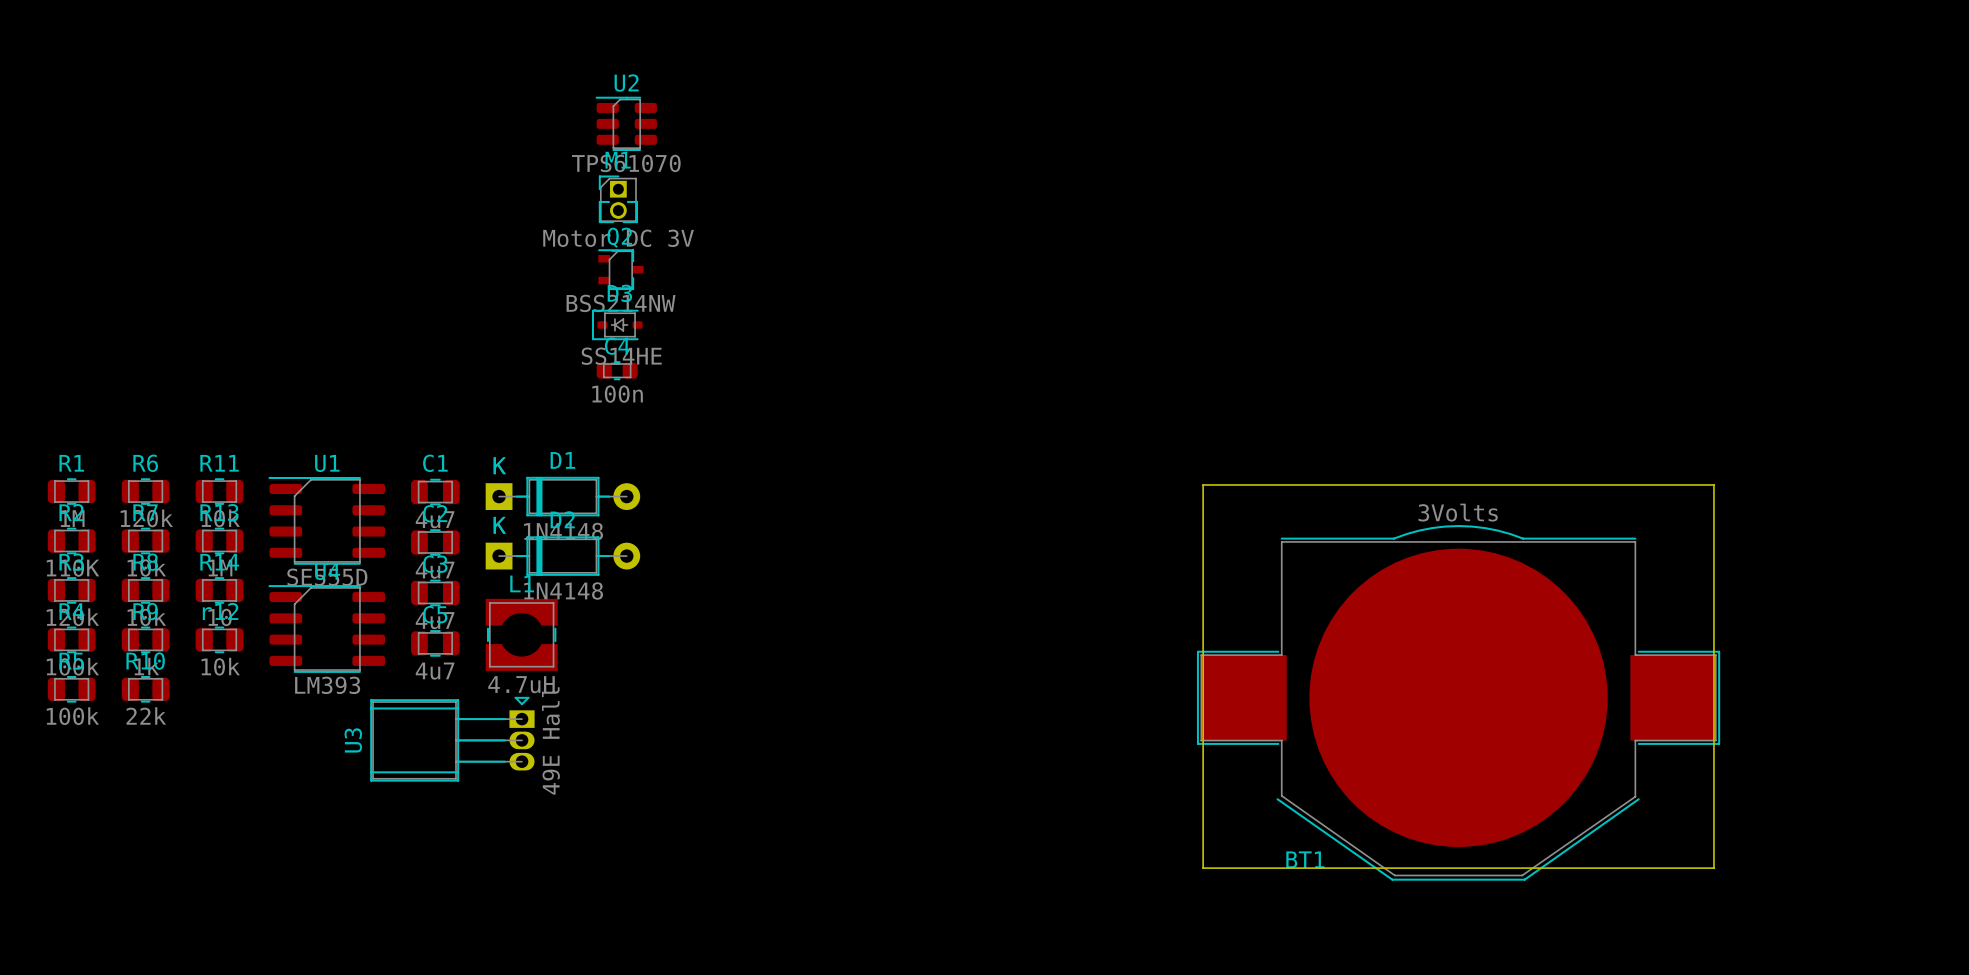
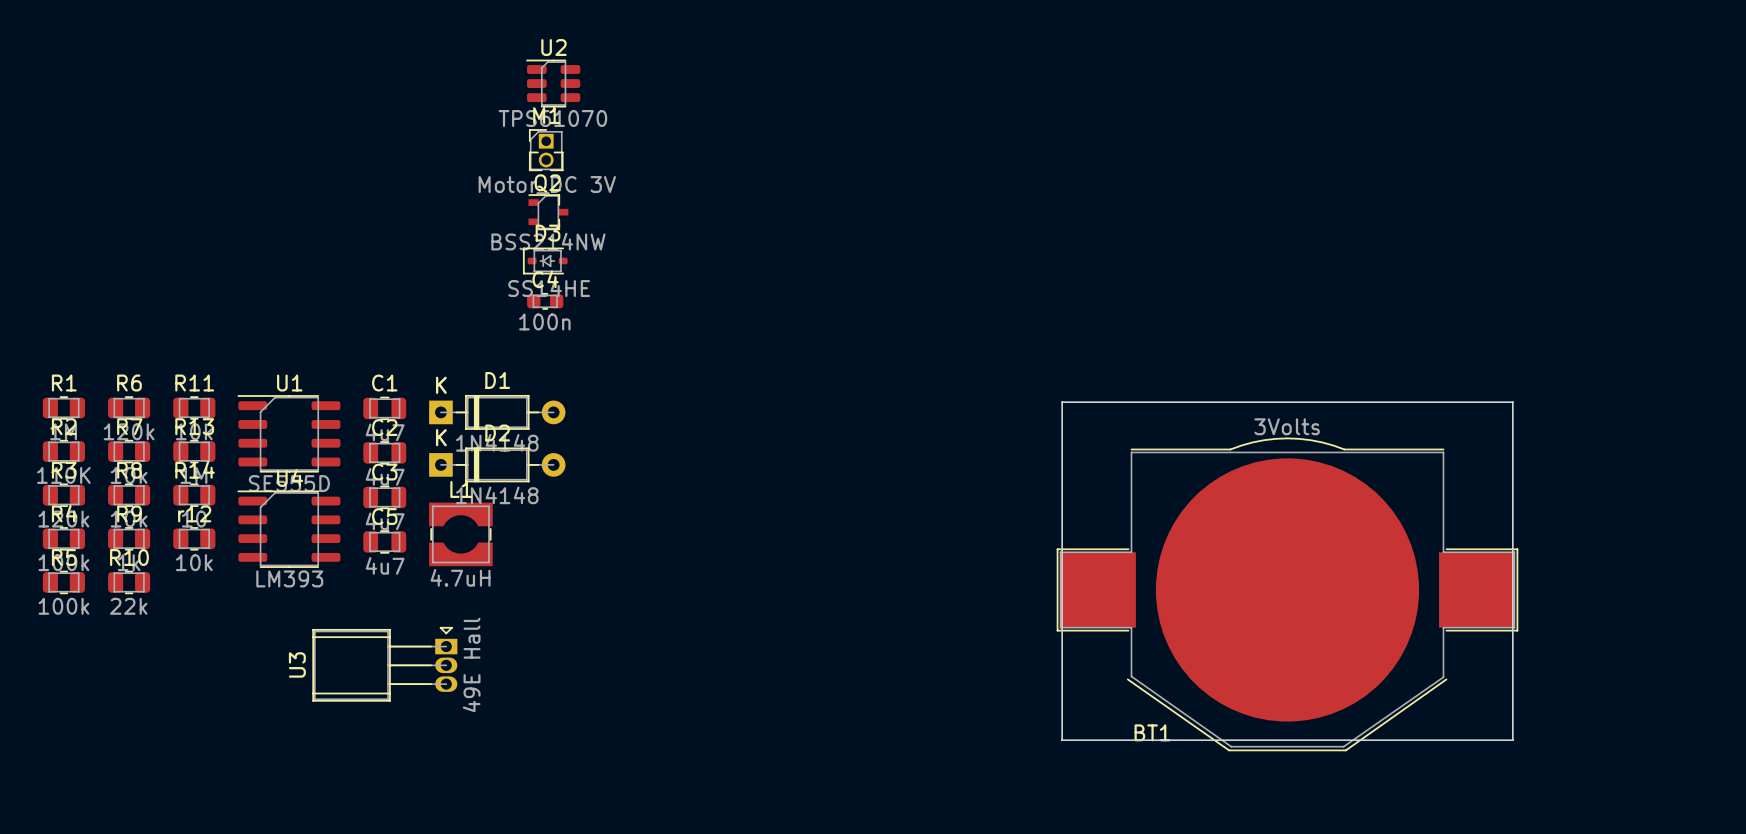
U3 position: (452, 739) -> (384, 664)

